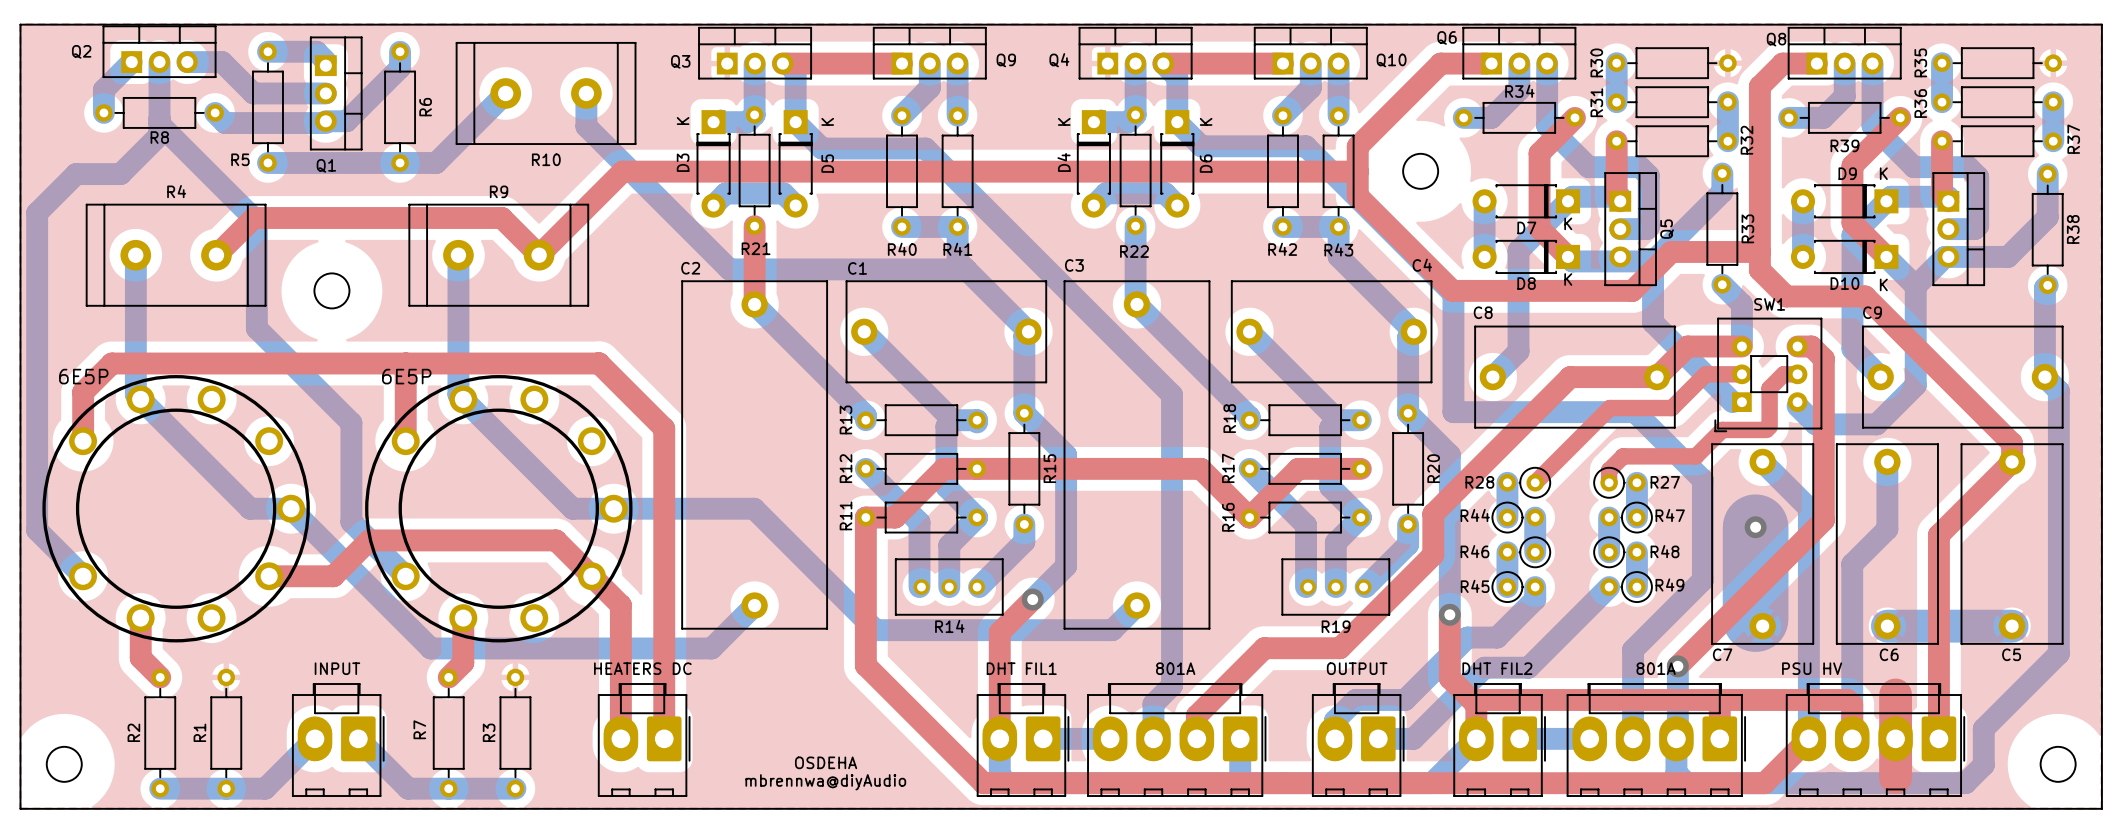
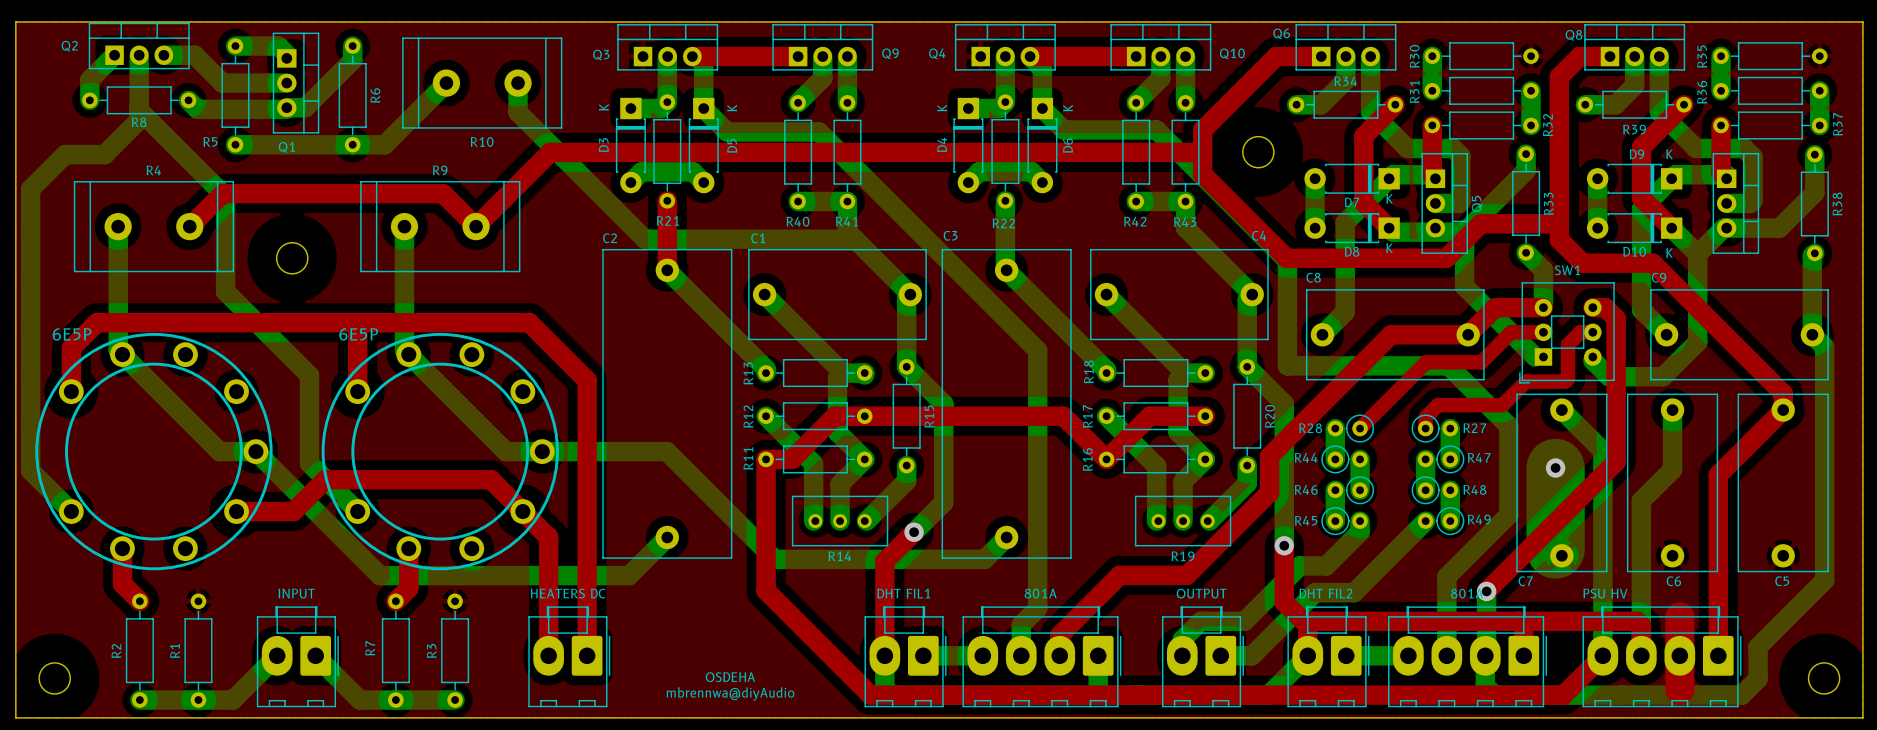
bottom track: (1887, 626) (2012, 626) -> none

